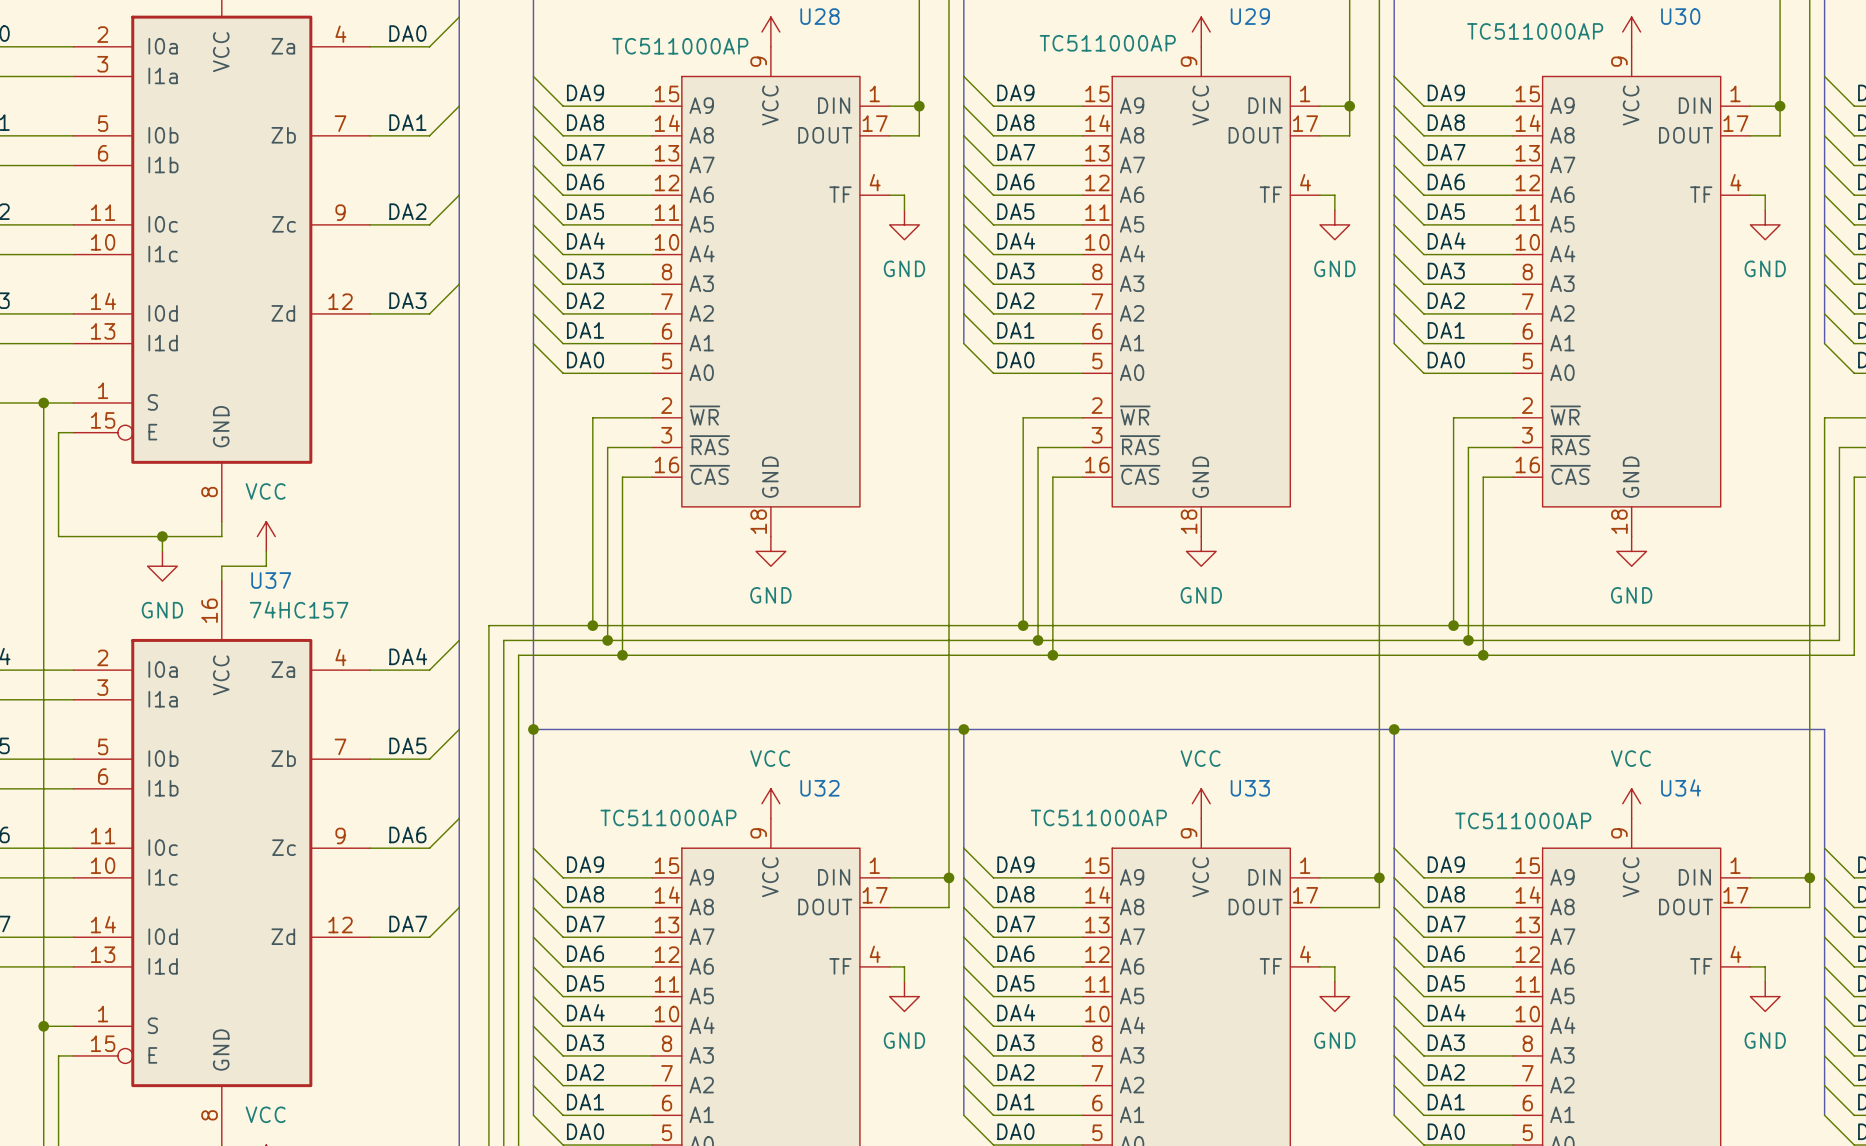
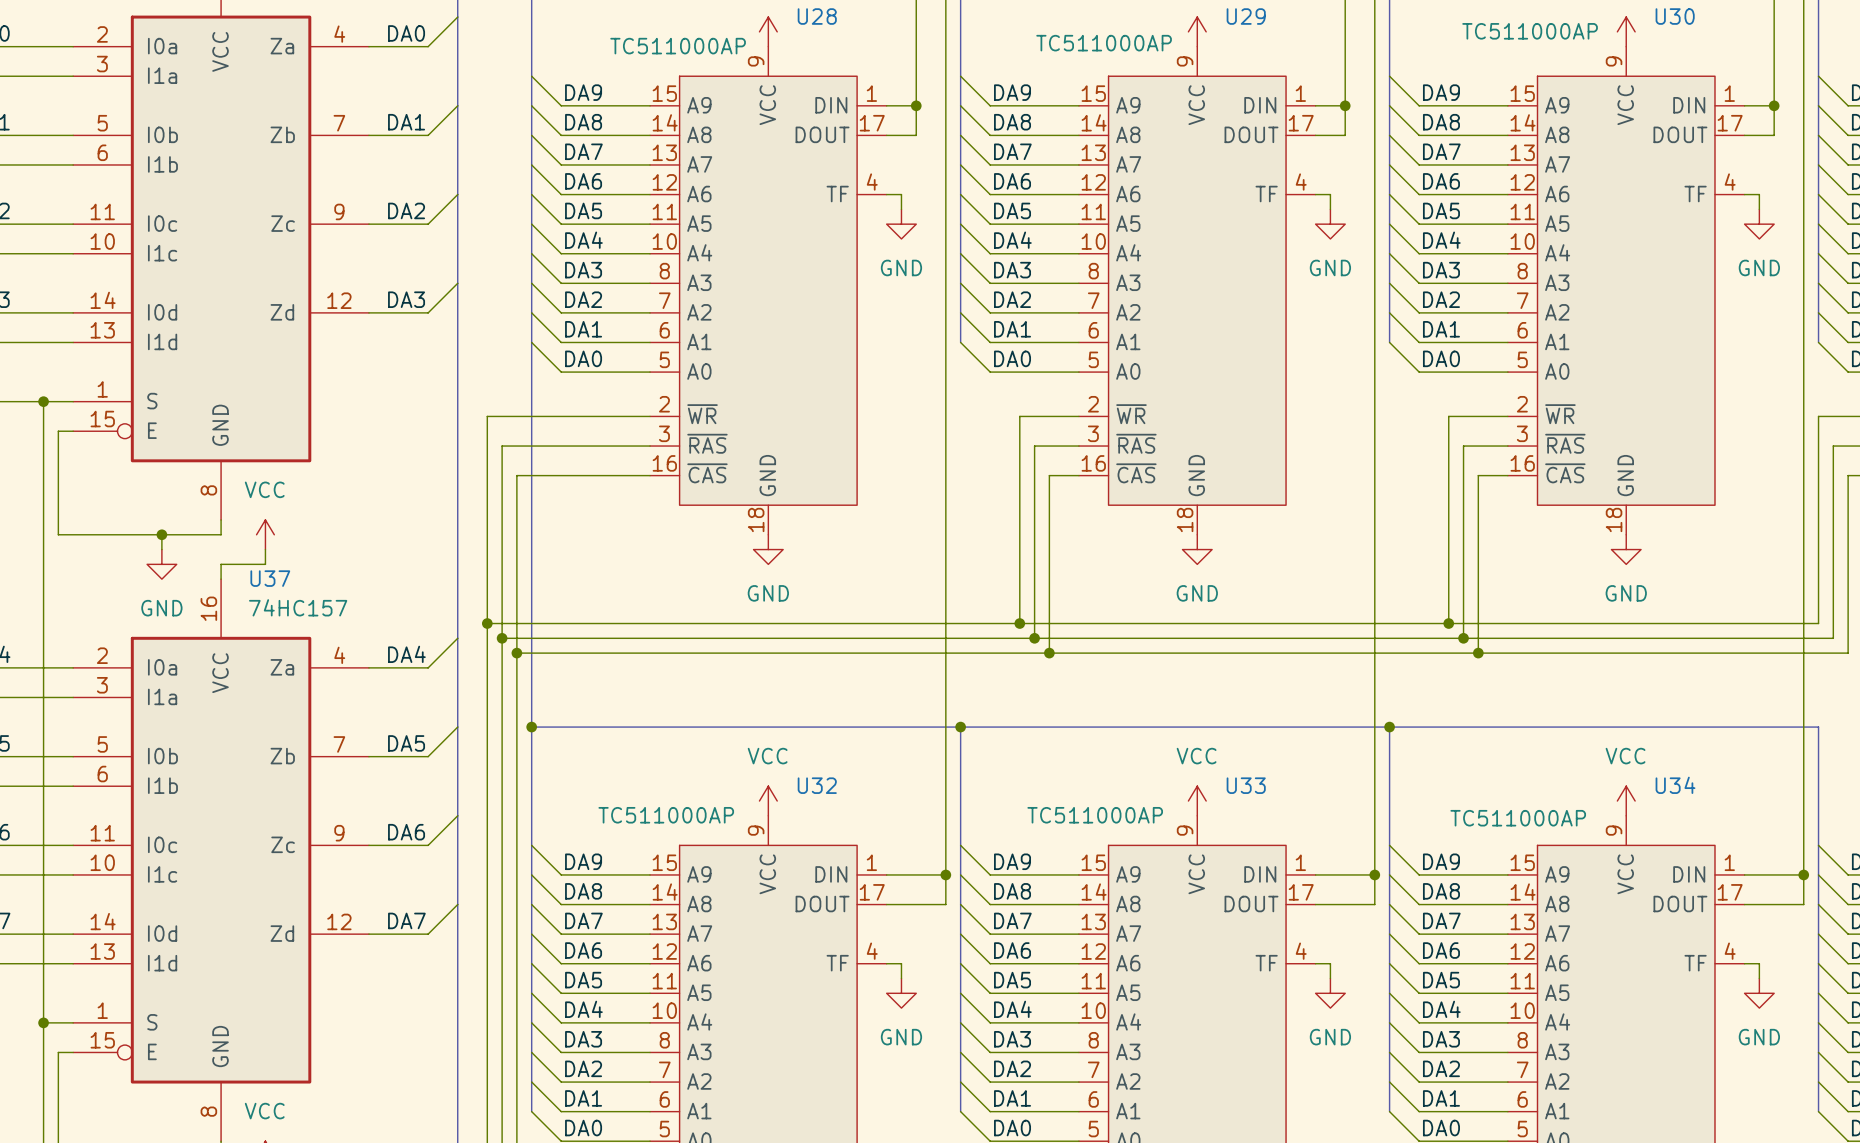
wire: (592, 417) (592, 625) -> (590, 416) (487, 416) (487, 623)
wire: (607, 447) (607, 640) -> (605, 446) (502, 446) (502, 638)
wire: (622, 477) (622, 655) -> (620, 475) (516, 475) (516, 653)
junction: none -> (487, 623)
junction: (592, 625) -> none
junction: none -> (502, 638)
junction: (607, 640) -> none
junction: none -> (516, 653)
junction: (622, 655) -> none

